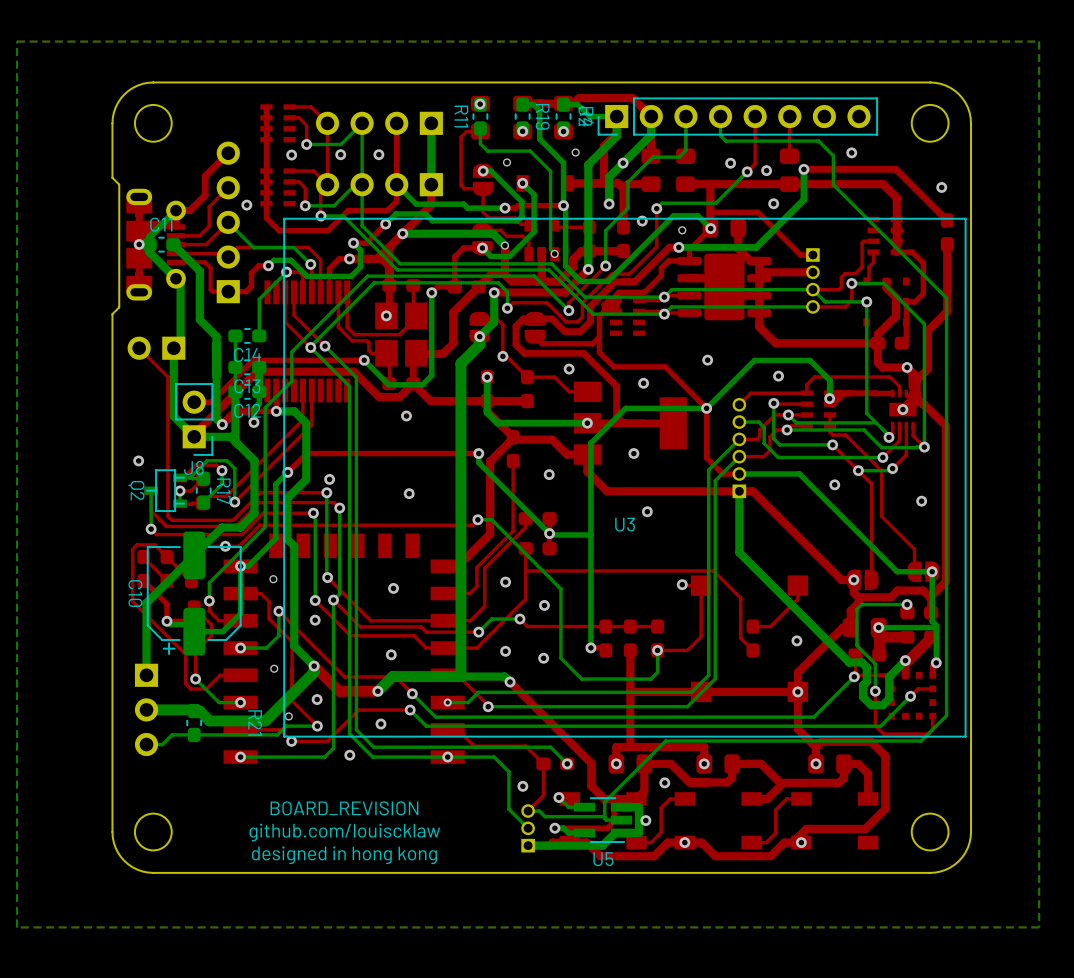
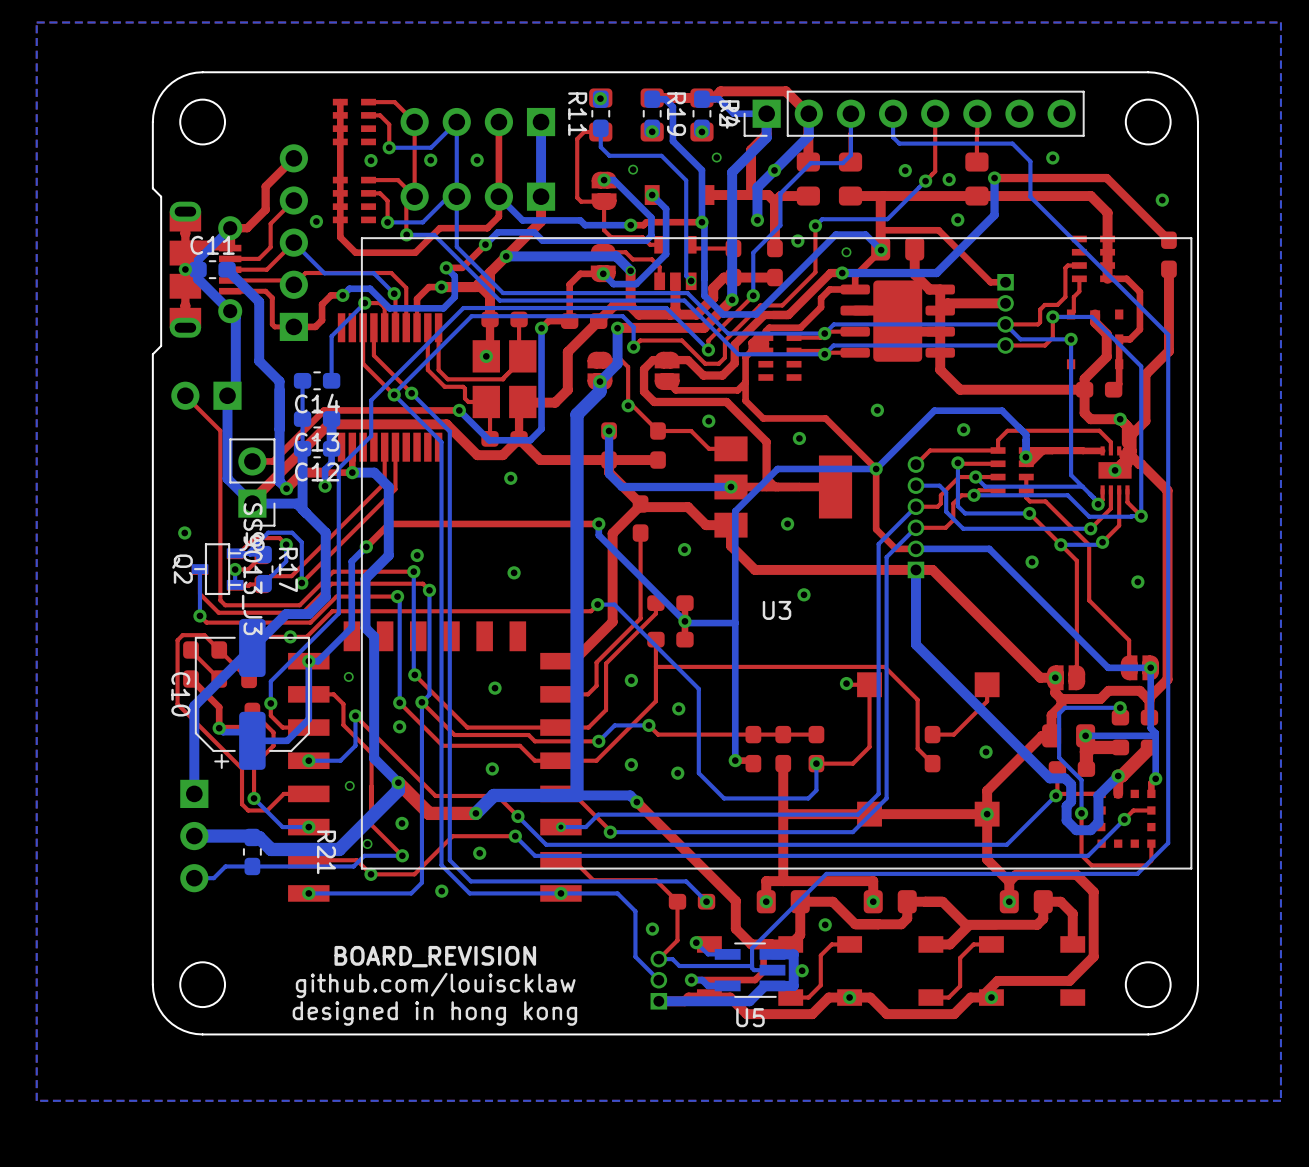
Q2 value: none -> SS9013_J3 (252, 569)

